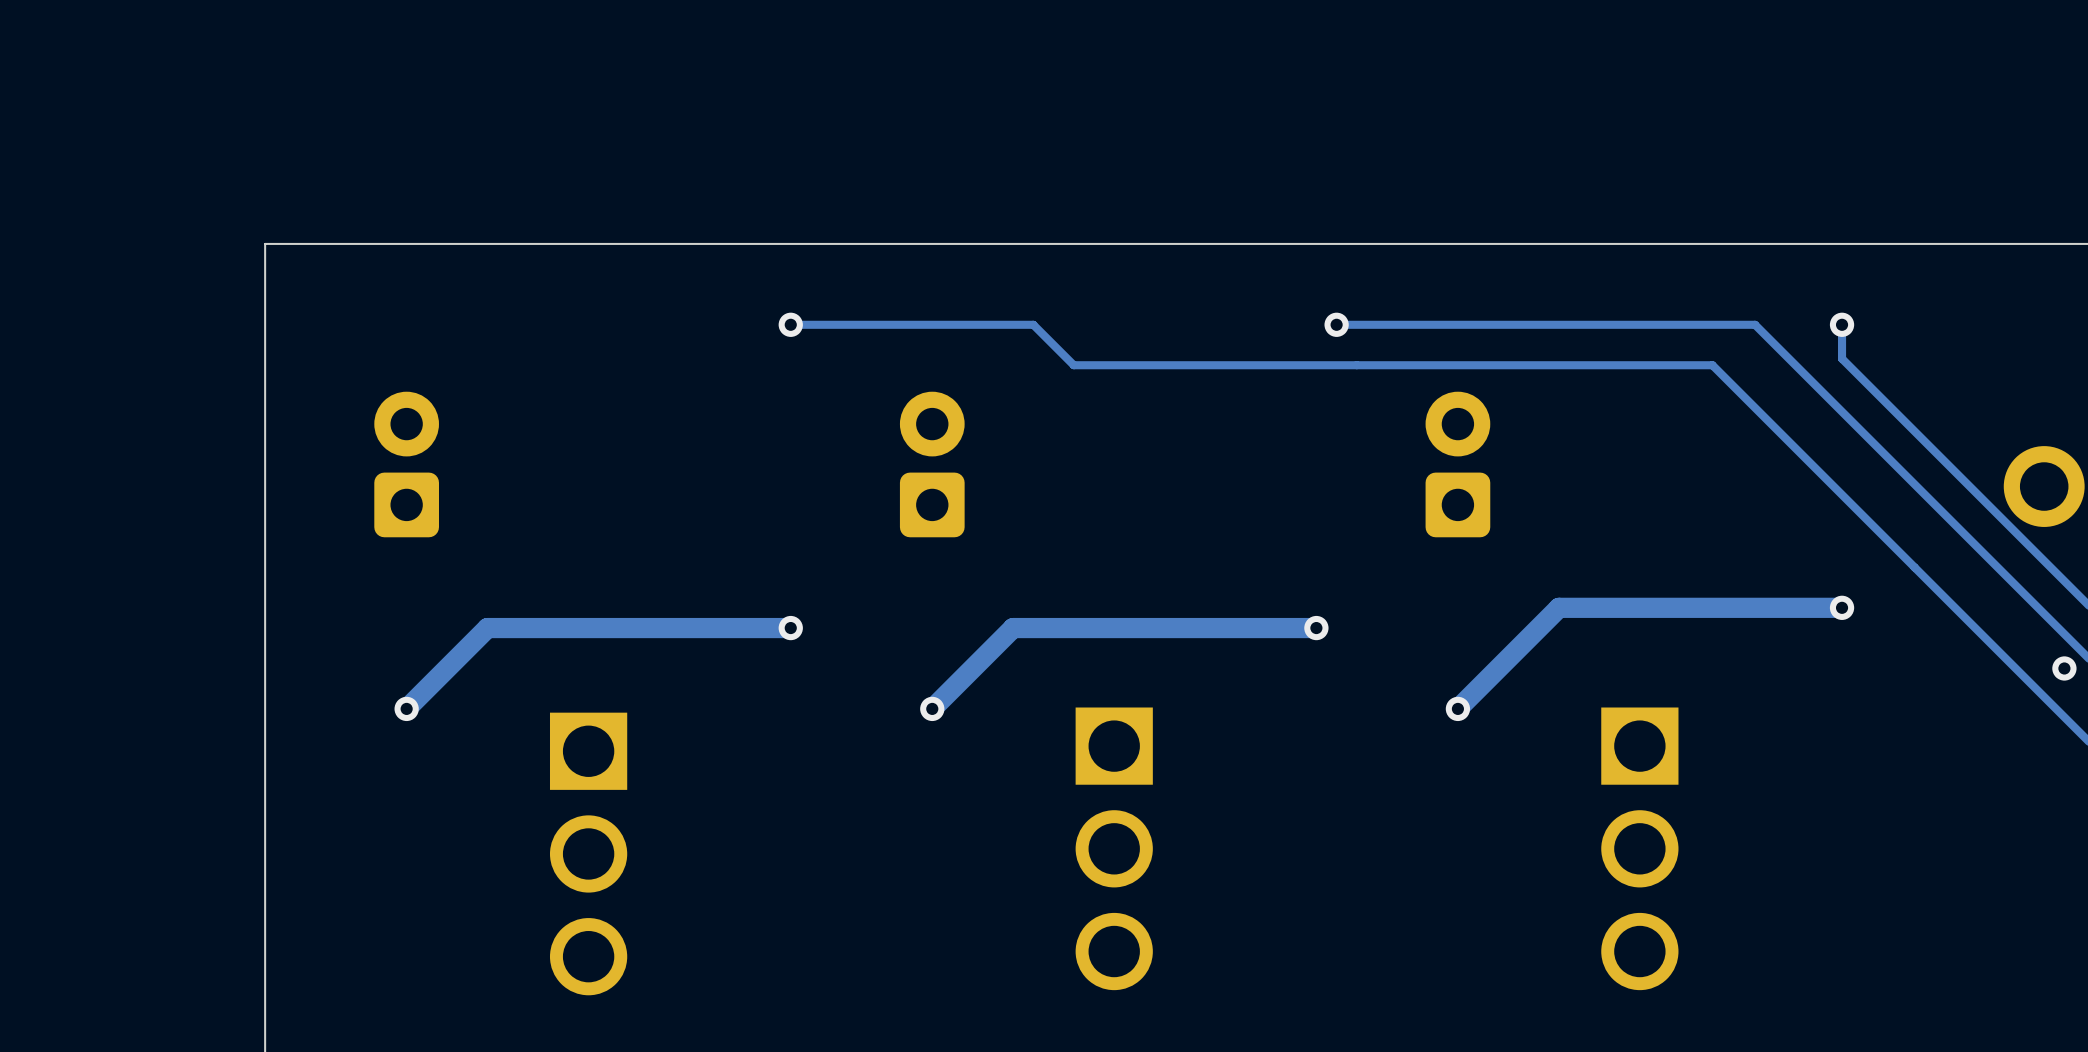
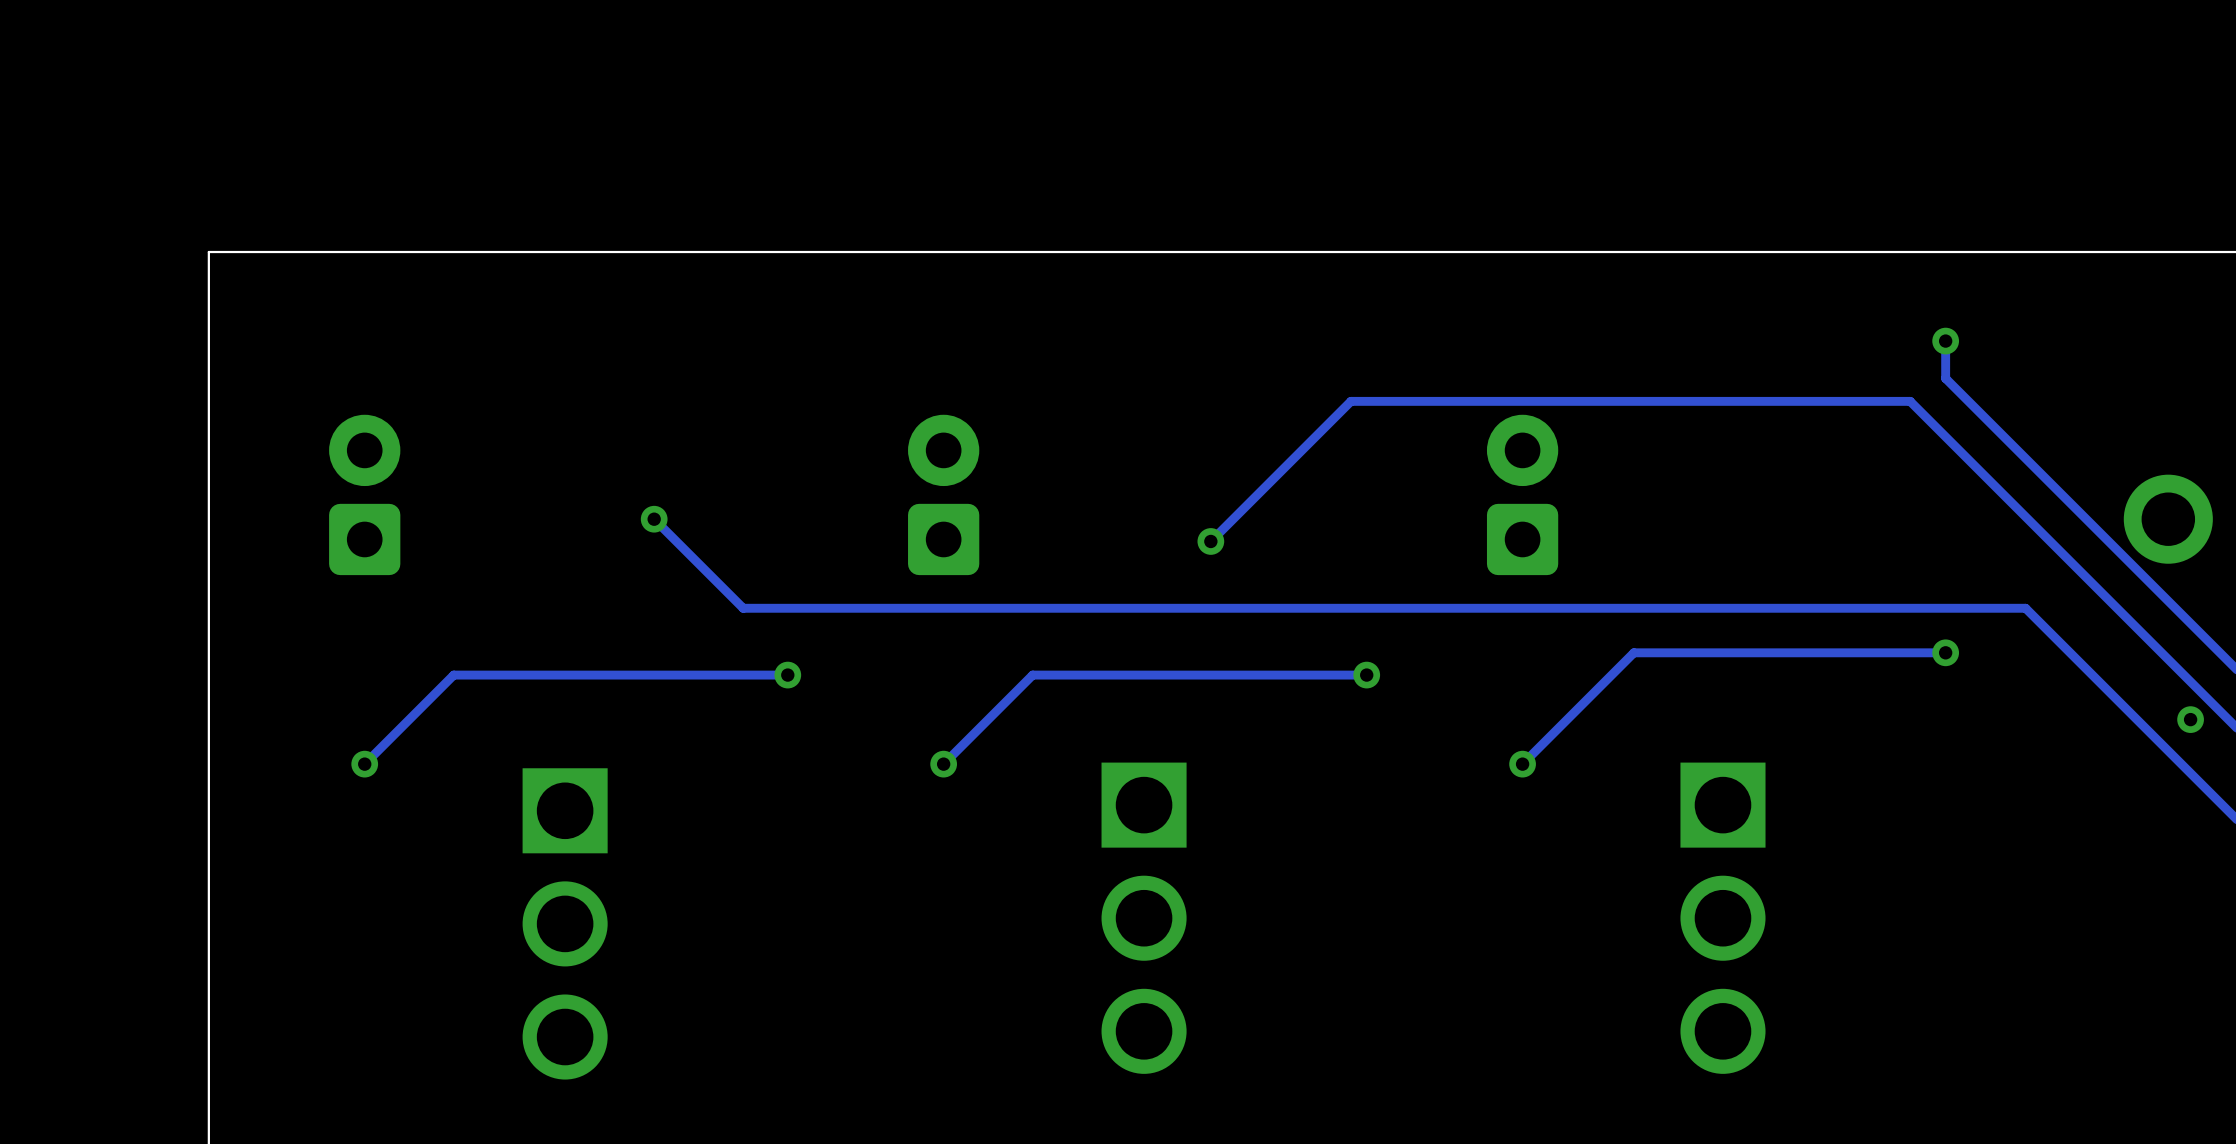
track: (790, 324) (1033, 324) (1073, 365) (1712, 365) (1914, 567) -> (654, 519) (743, 608) (2025, 608)
via position: (790, 324) -> (654, 519)
track: (1336, 324) (1755, 324) (1809, 379) -> (1210, 541) (1350, 401) (1910, 401)
via: (1336, 324) -> none
via: none -> (1210, 541)
track width: thick (1842, 607) (1559, 607) (1457, 708) -> thin (1945, 652) (1633, 652) (1522, 764)
track width: thick (790, 628) (487, 628) (406, 708) -> thin (787, 675) (453, 675) (364, 764)
track width: thick (1316, 628) (1013, 628) (932, 708) -> thin (1366, 675) (1032, 675) (943, 764)

